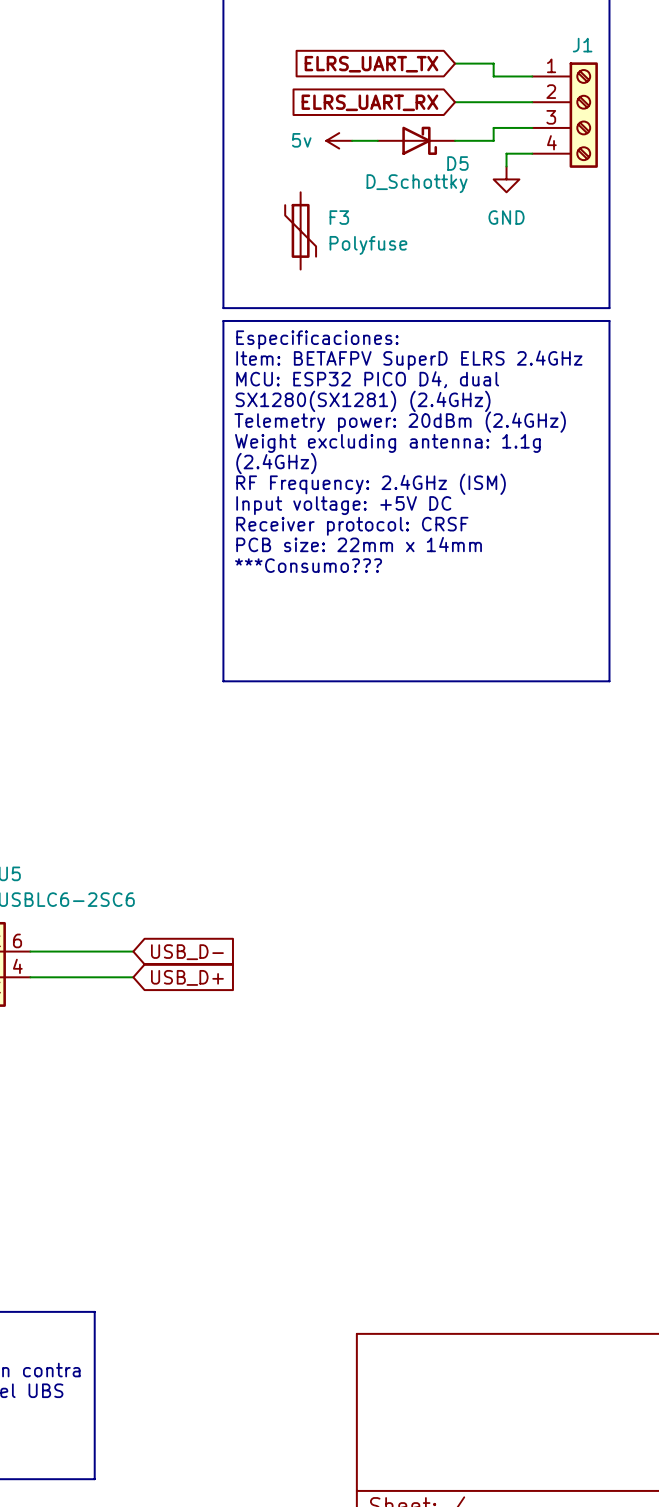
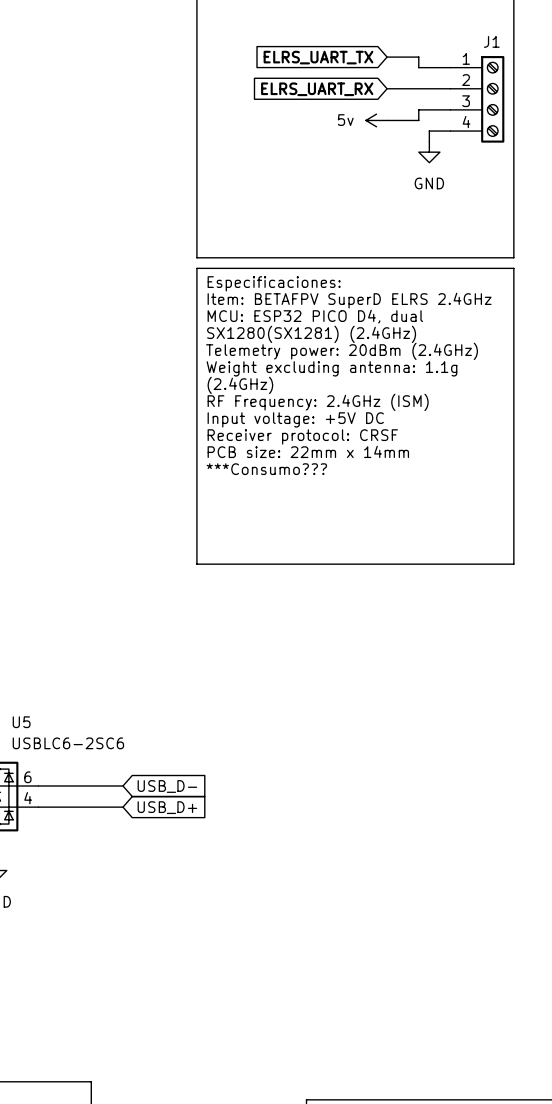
power symbol position: 5v (339, 140) -> 5v (376, 120)
wire: (352, 140) (377, 140) -> none
D5: D_Schottky (416, 140) -> none
F3: Polyfuse (300, 230) -> none

